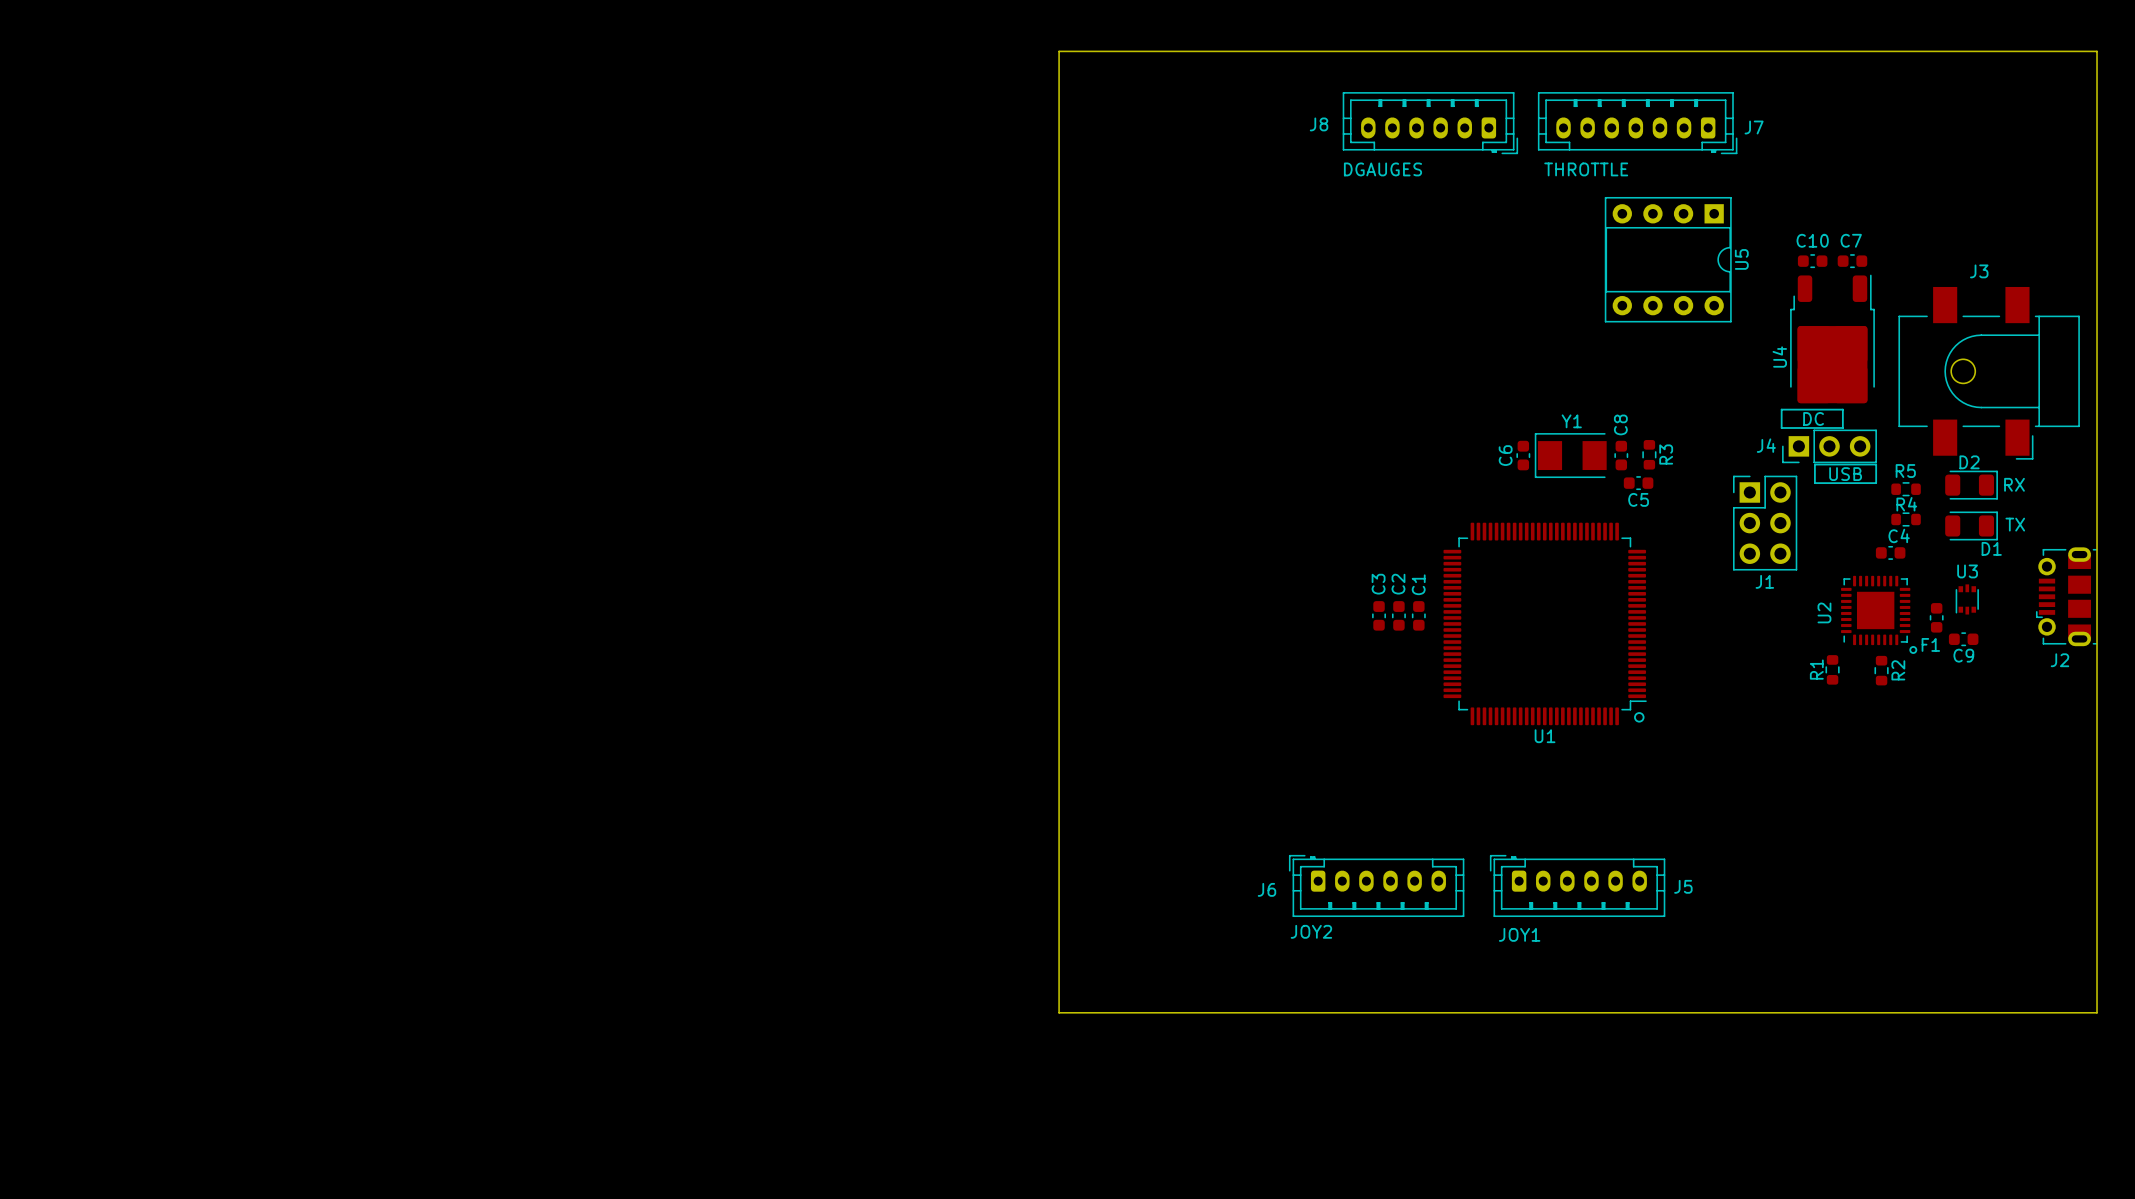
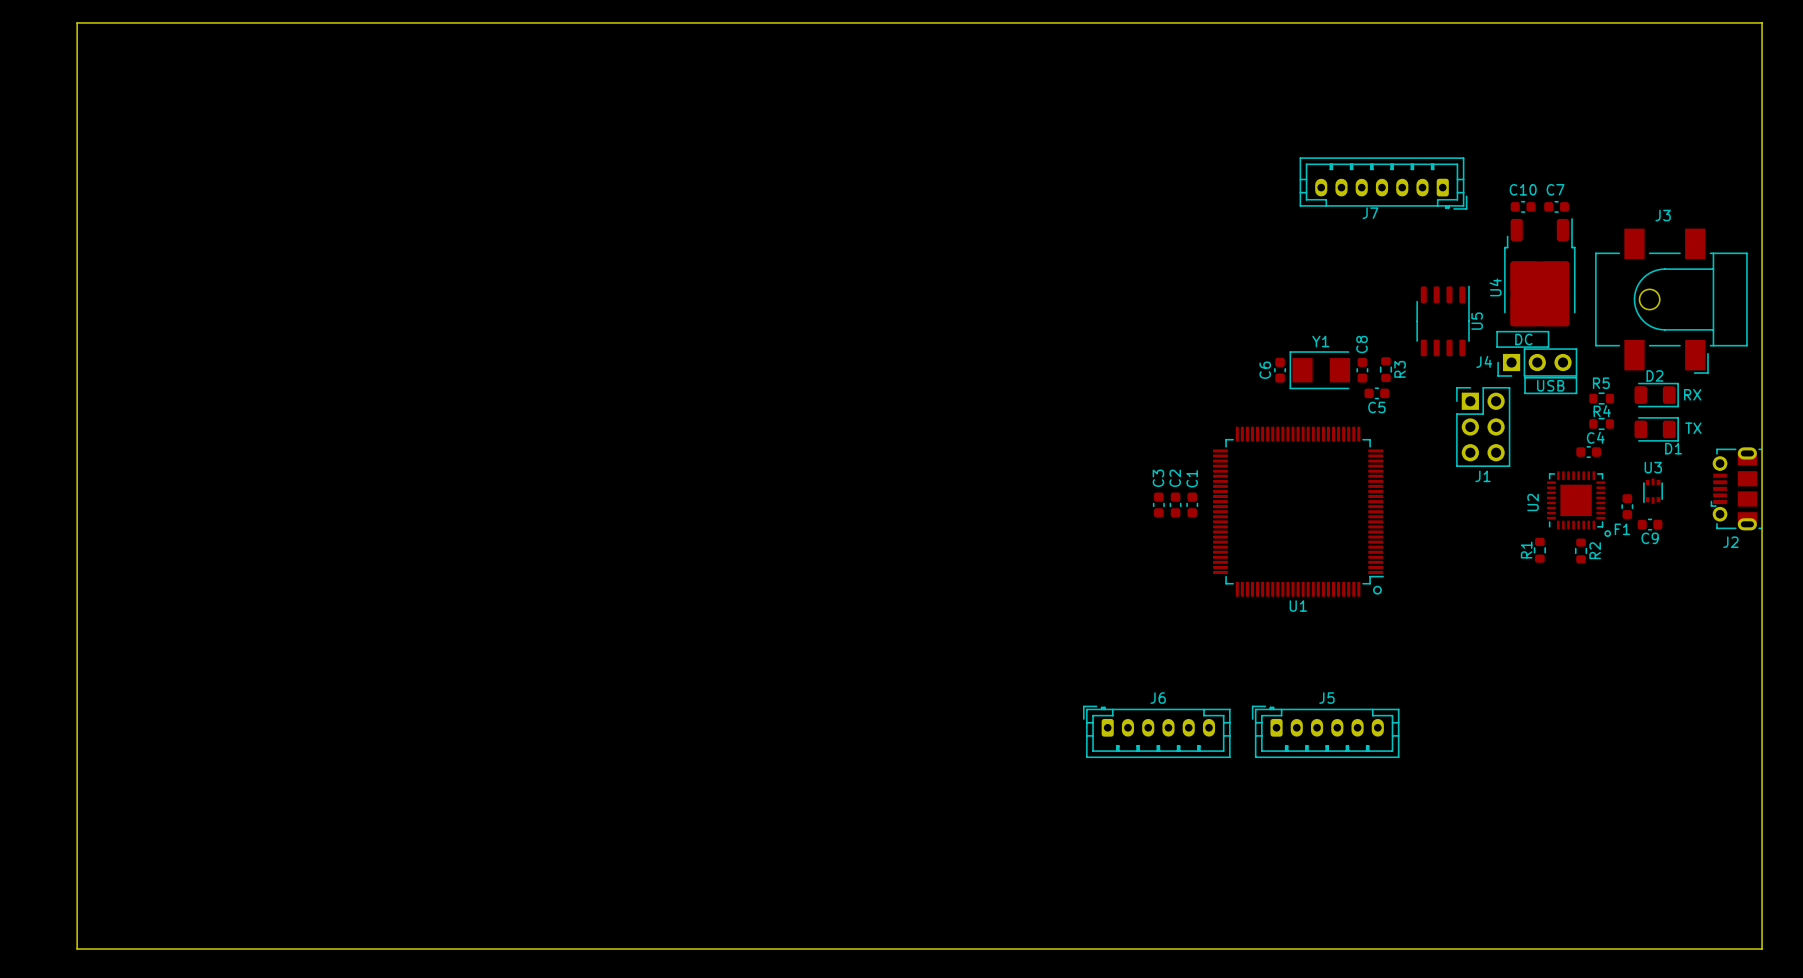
board edge: (2097, 51) (1059, 51) (1059, 1012) (2097, 1012) -> (1762, 30) (1762, 22) (77, 22) (77, 949) (1762, 949) (1762, 838)
J8: (1430, 123) -> none
J7 position: (1637, 123) -> (1383, 183)
J7 name position: J7 (1754, 127) -> J7 (1370, 213)
text: DGAUGES (1382, 169) -> none
text: THROTTLE (1586, 169) -> none
U5 footprint: [1604, 197, 1732, 323] -> [1416, 285, 1470, 357]
U5 name position: U5 (1741, 259) -> U5 (1477, 321)
J5 name position: J5 (1683, 886) -> J5 (1326, 698)
J6 name position: J6 (1266, 889) -> J6 (1158, 698)
text: JOY2 (1311, 931) -> none
text: JOY1 (1519, 934) -> none

